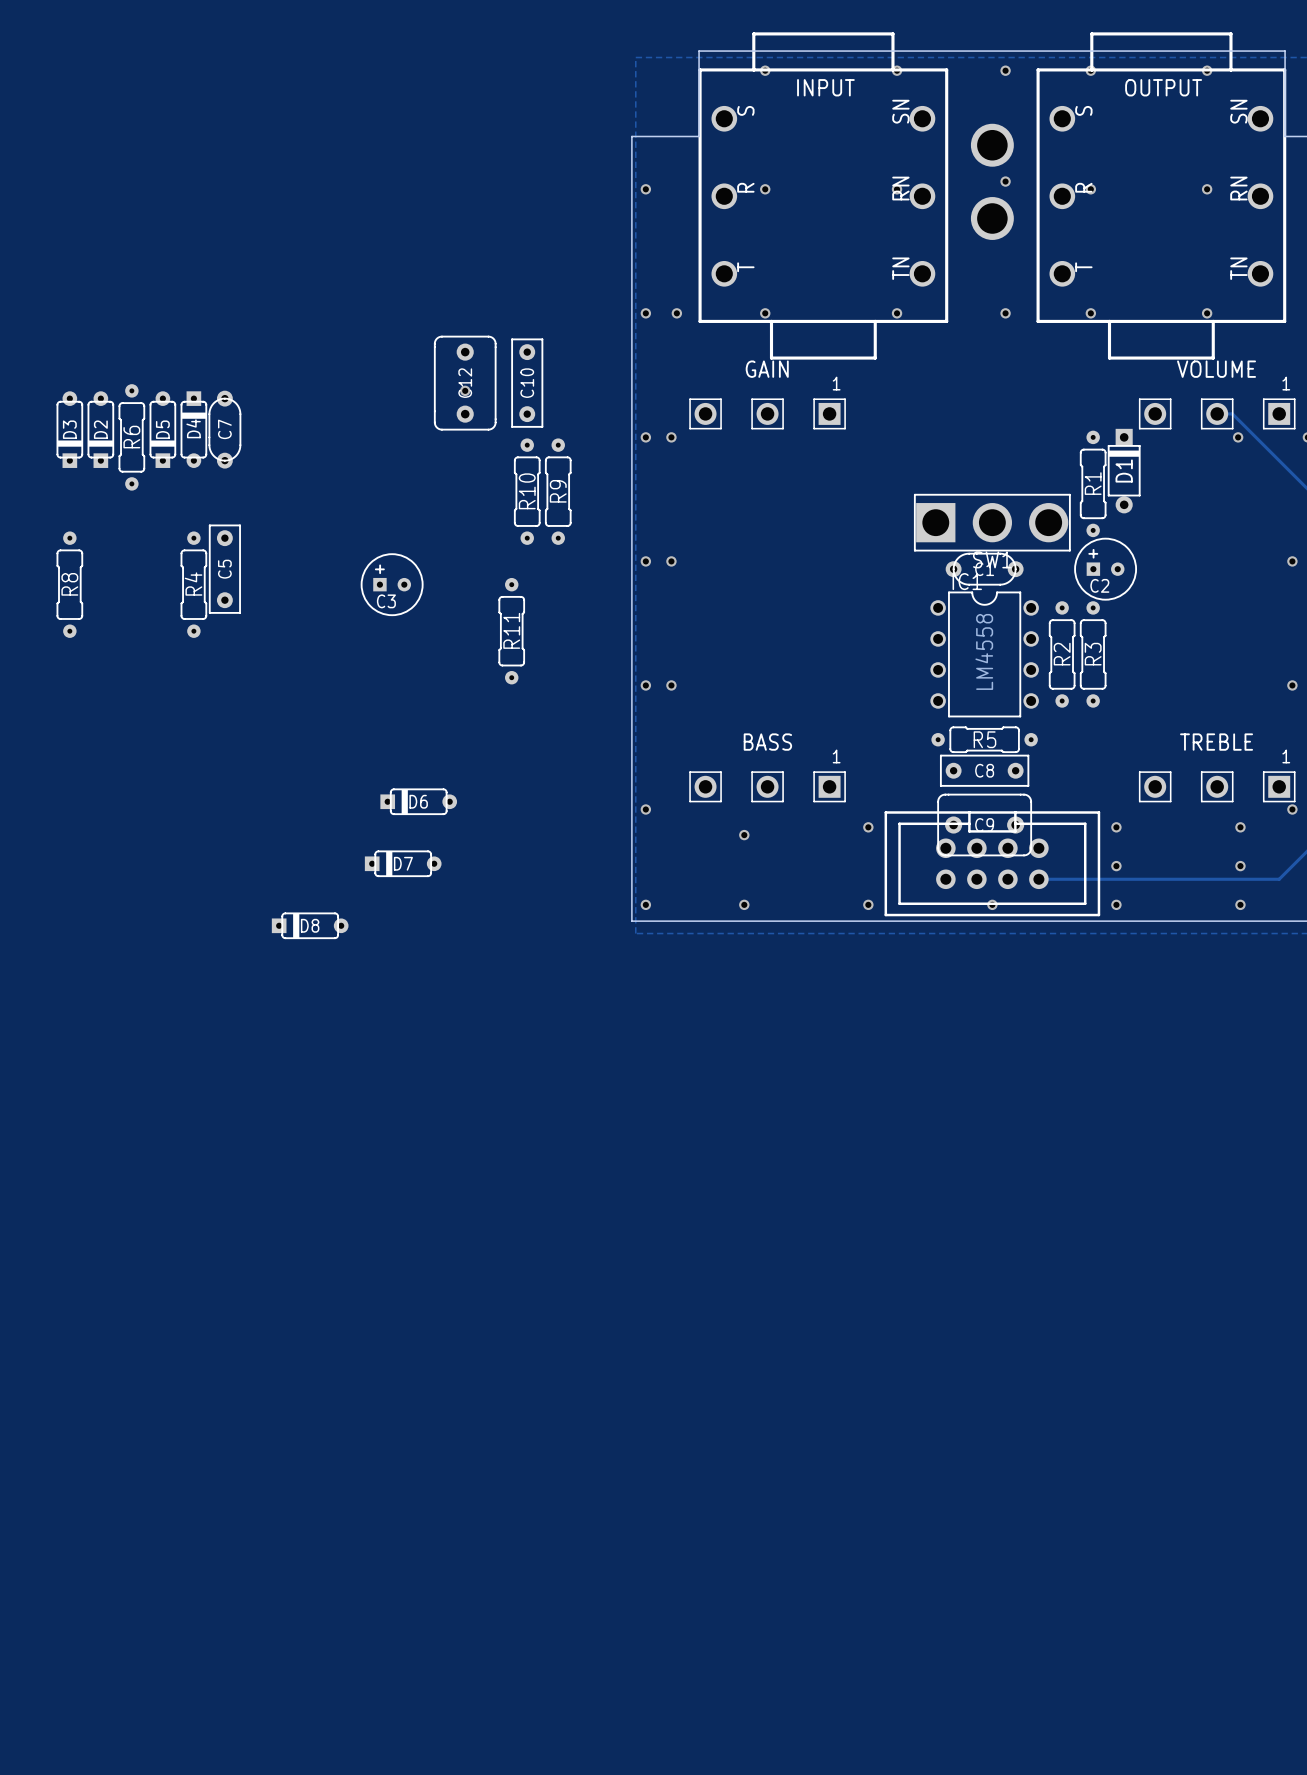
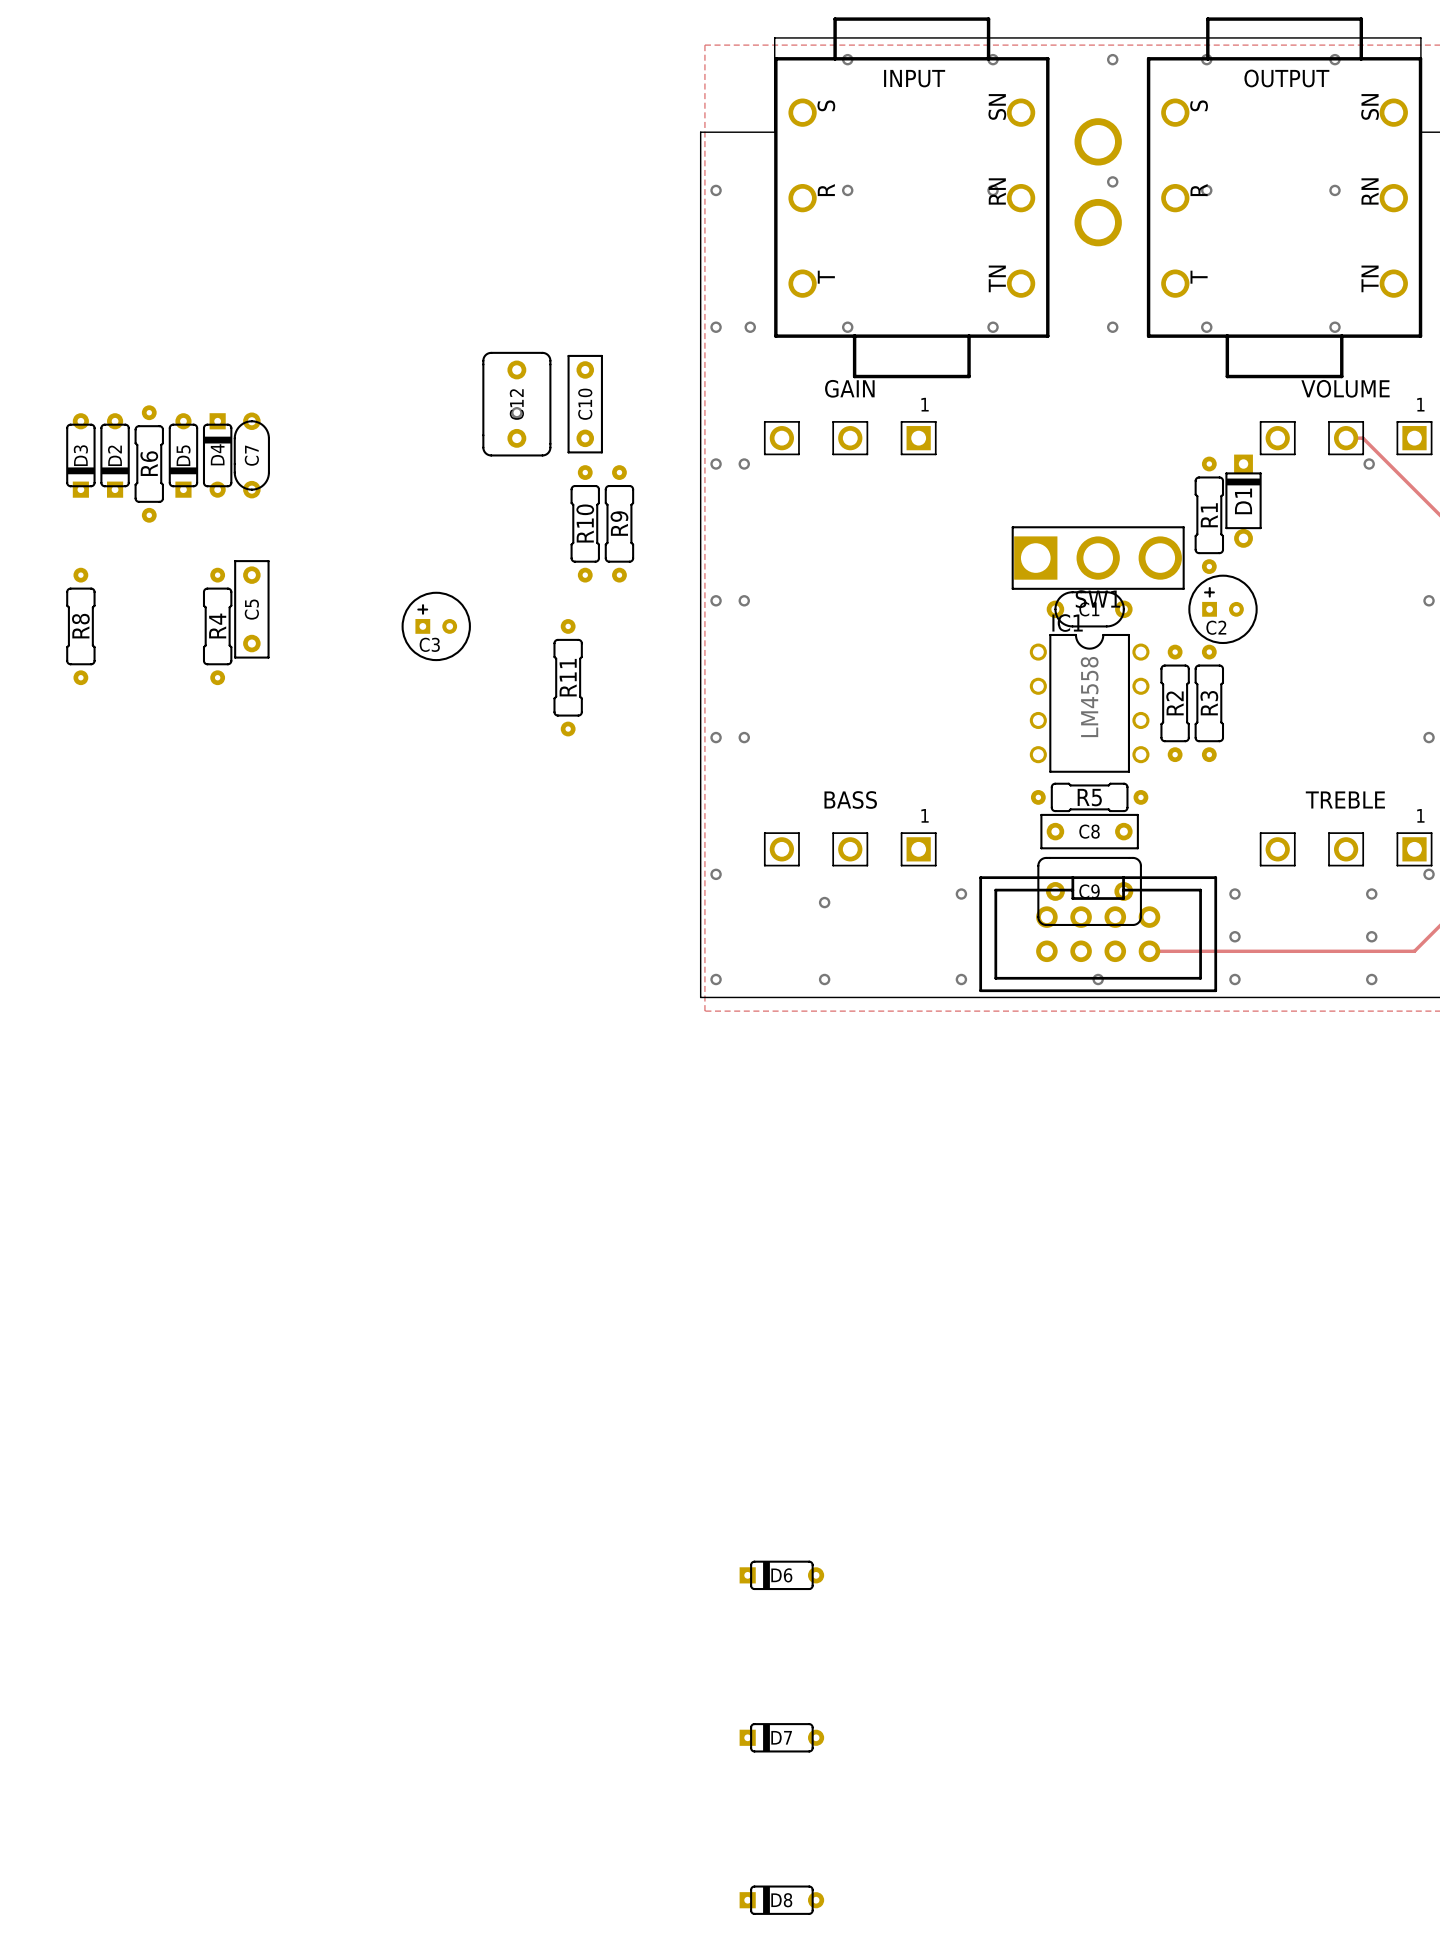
D6 position: (418, 801) -> (781, 1575)
D7 position: (403, 863) -> (781, 1737)
D8 position: (310, 925) -> (781, 1900)

